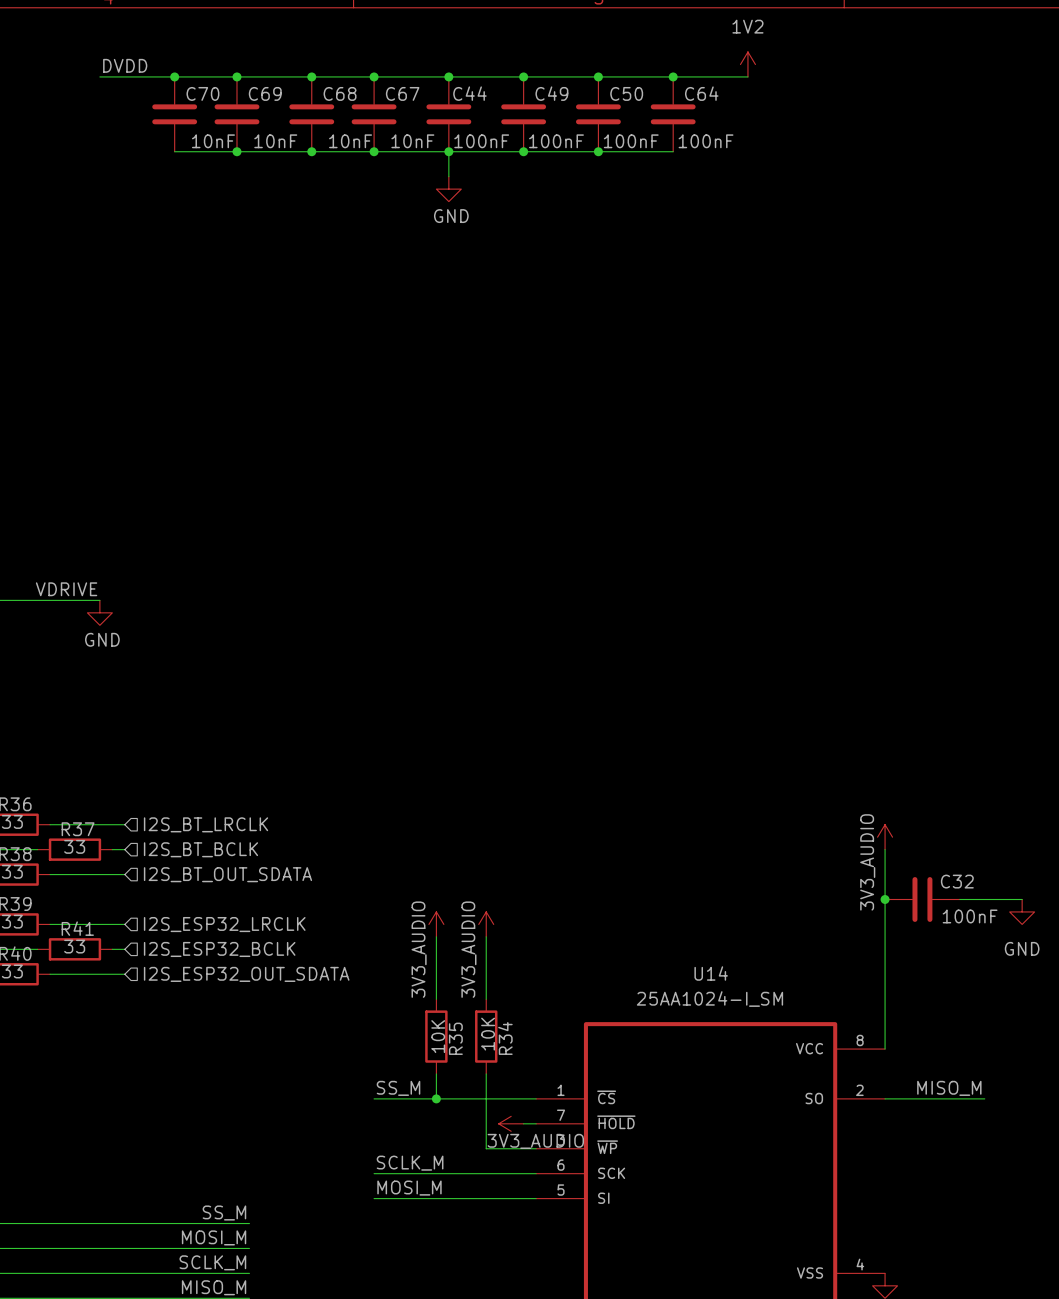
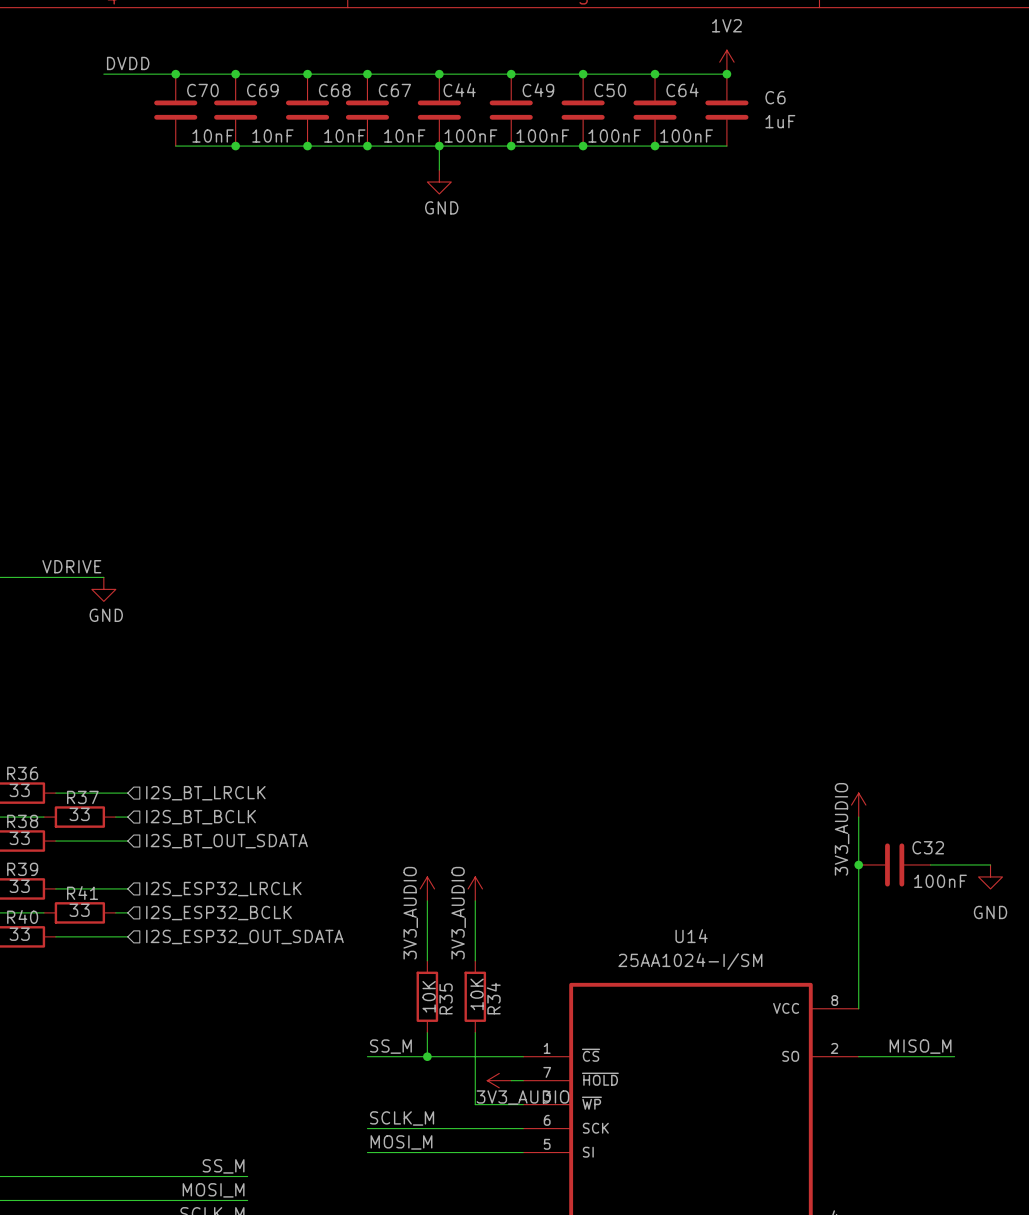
junction: none -> (726, 74)
C6: none -> 1uF (726, 110)
wire: none -> (655, 146) (726, 146)
junction: none -> (655, 146)
U14 value: 25AA1024-I_SM (709, 999) -> 25AA1024-I/SM (690, 961)

